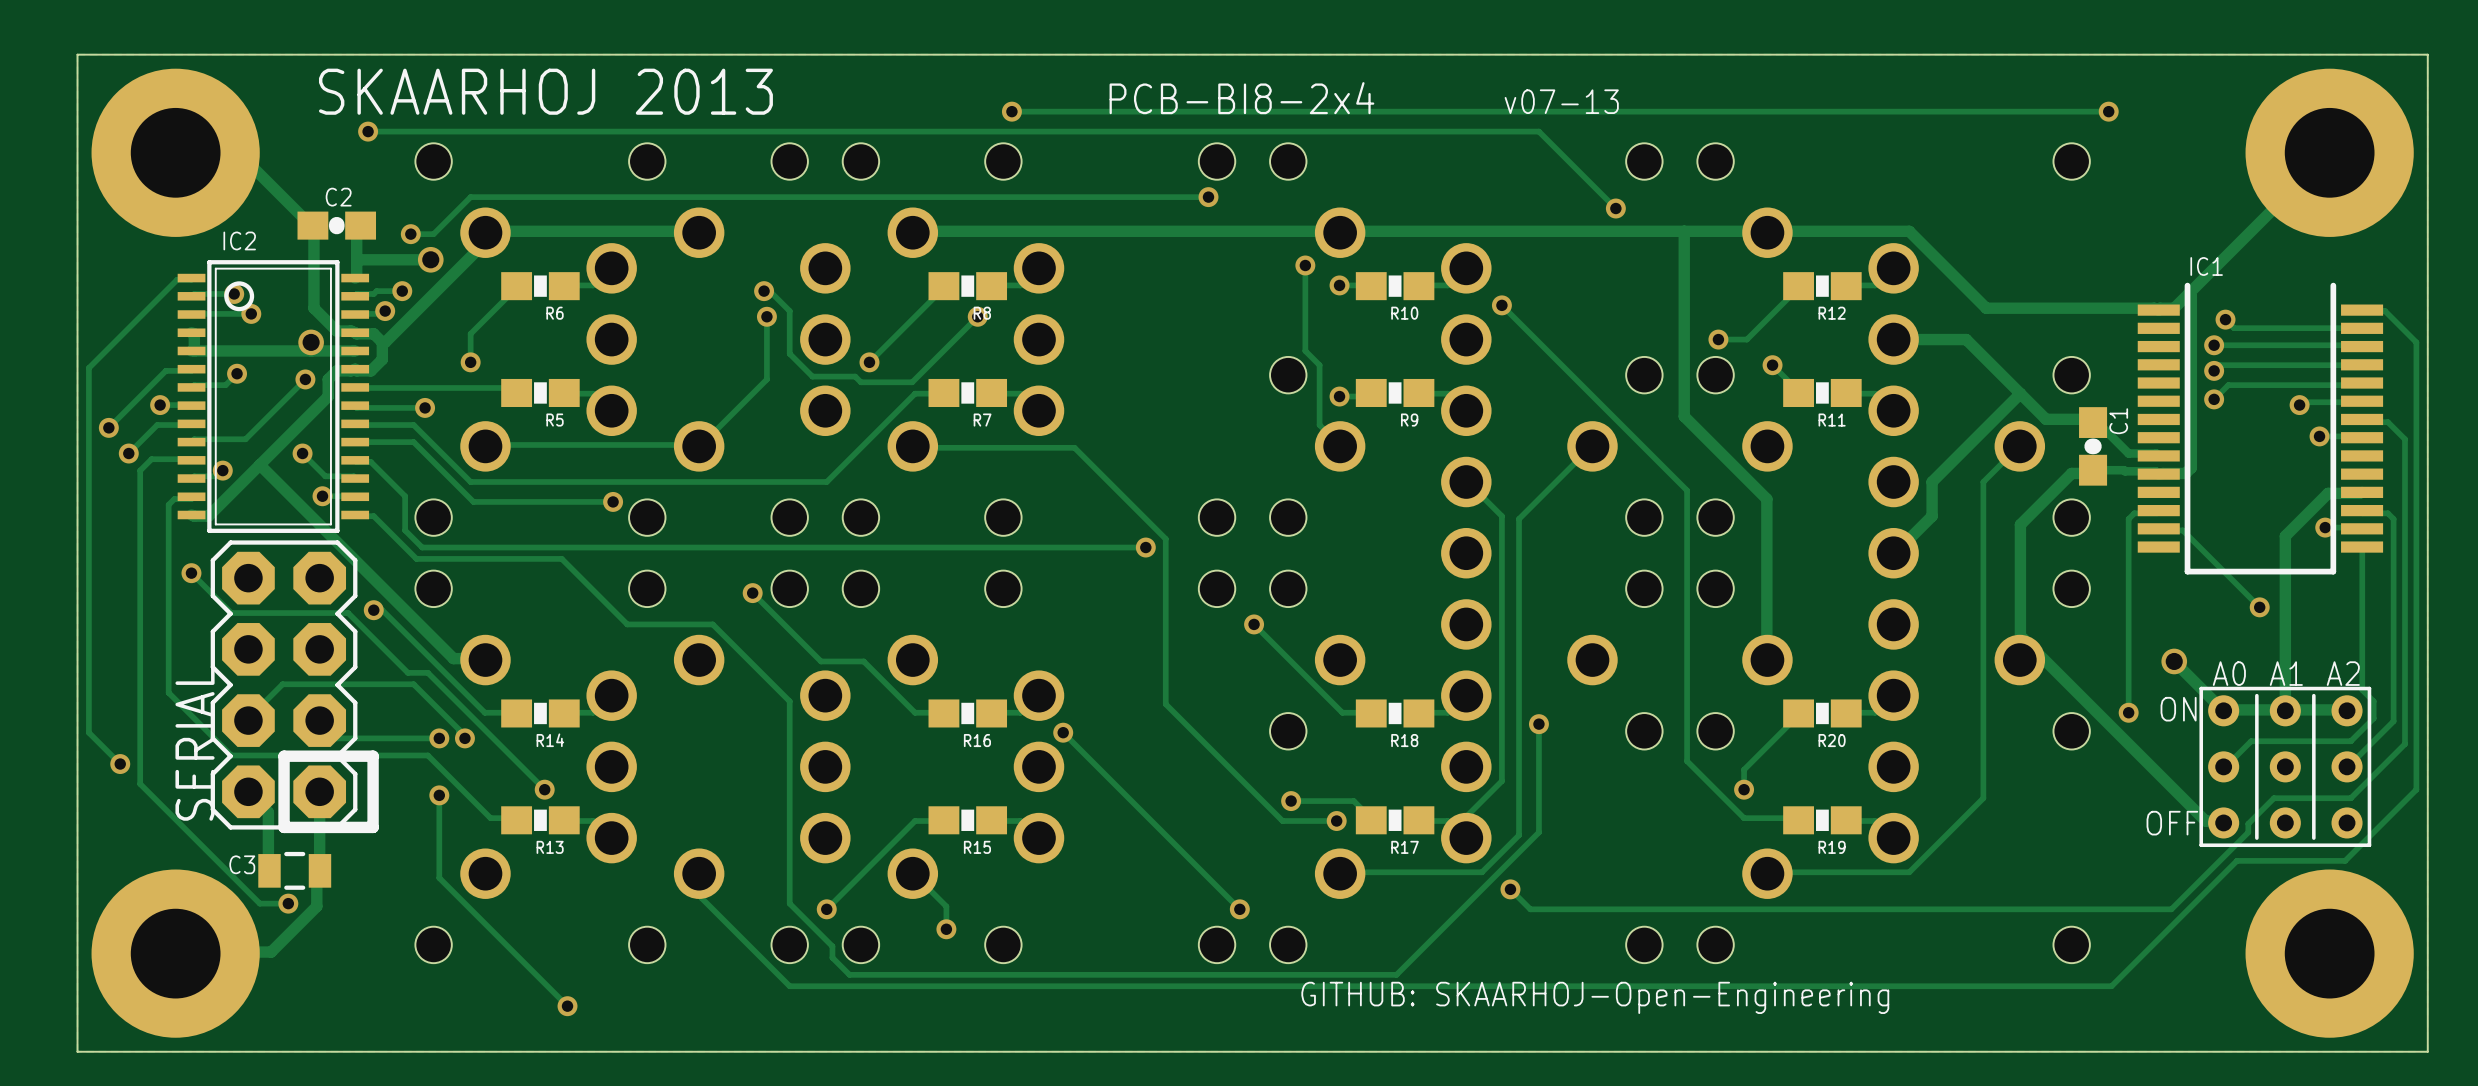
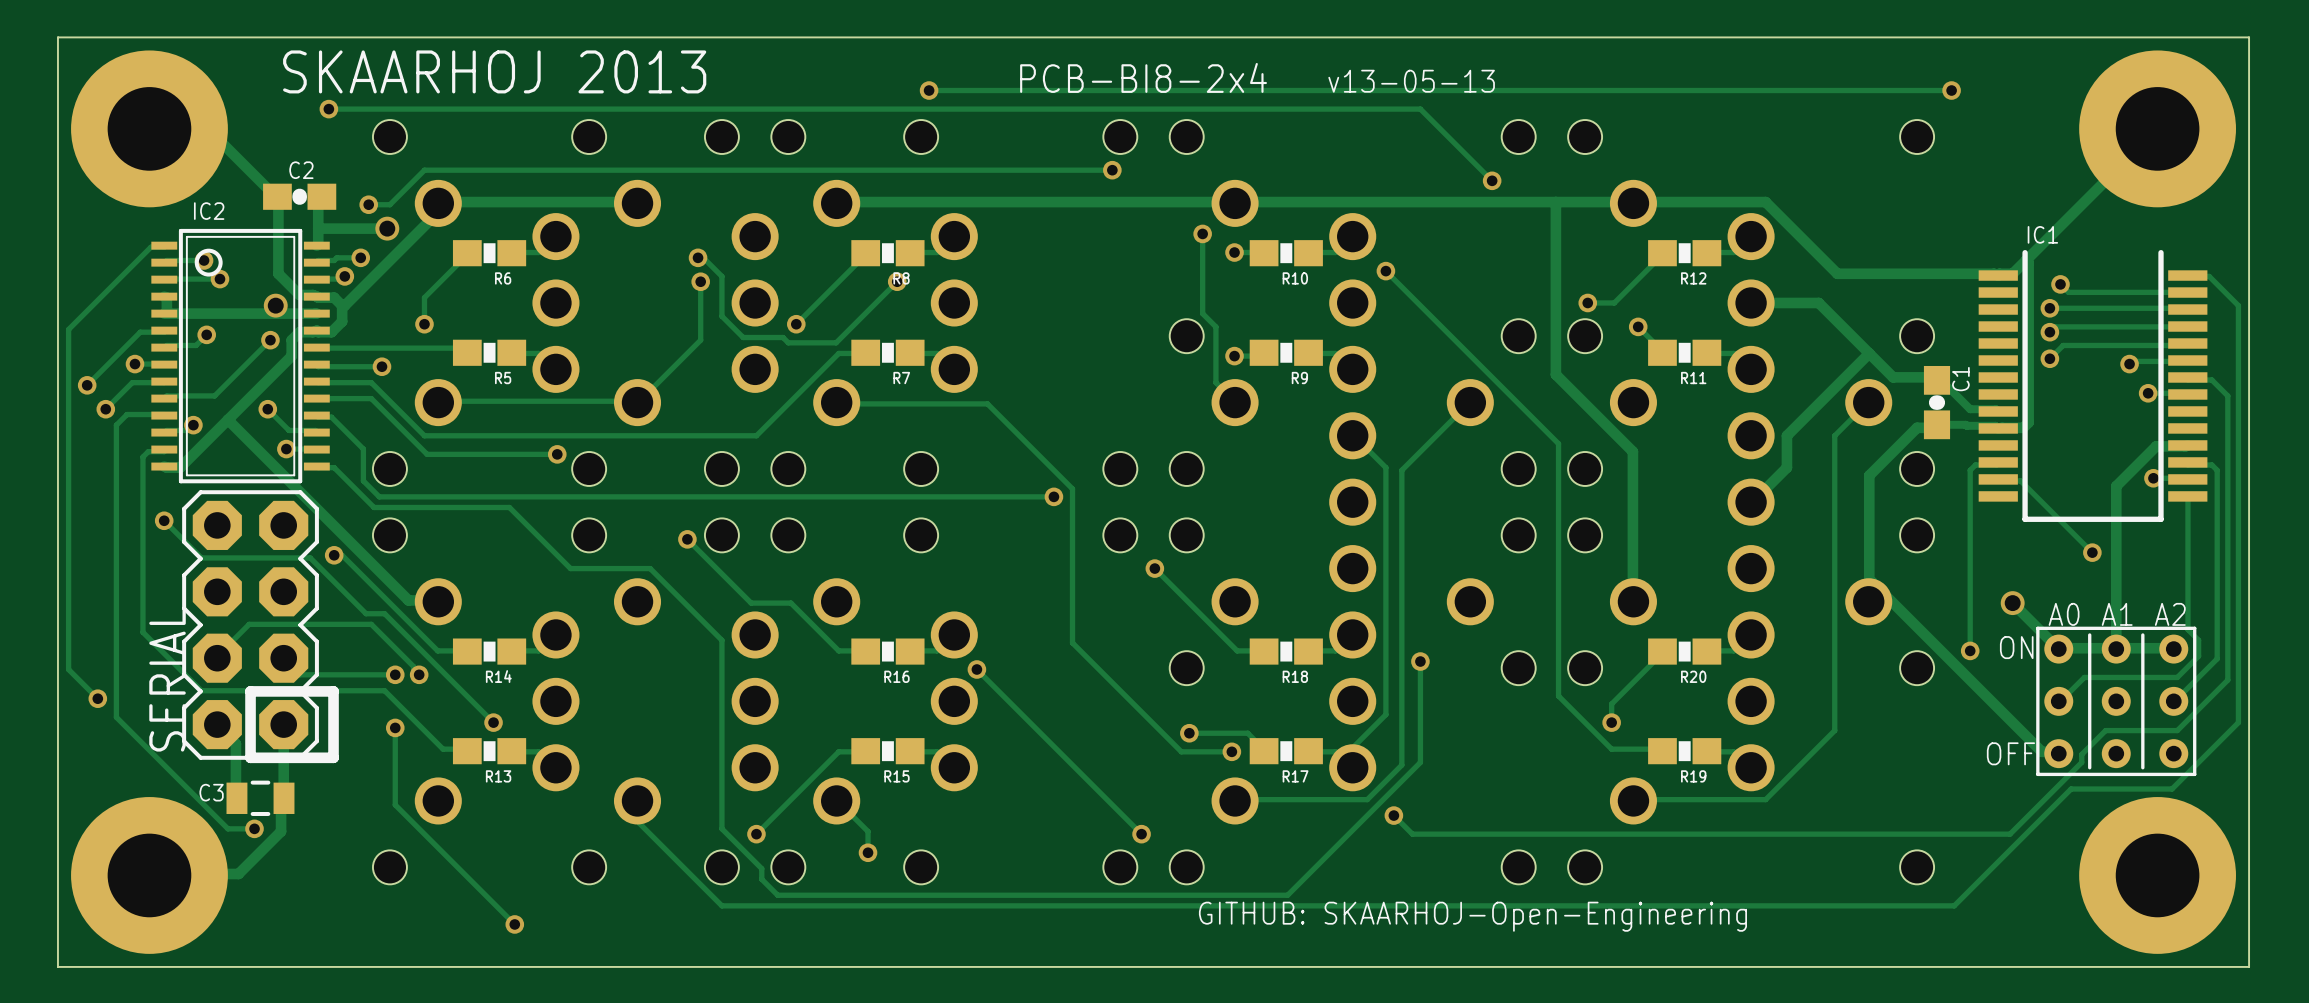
text: v07-13 (1561, 101) -> v13-05-13 (1411, 81)

